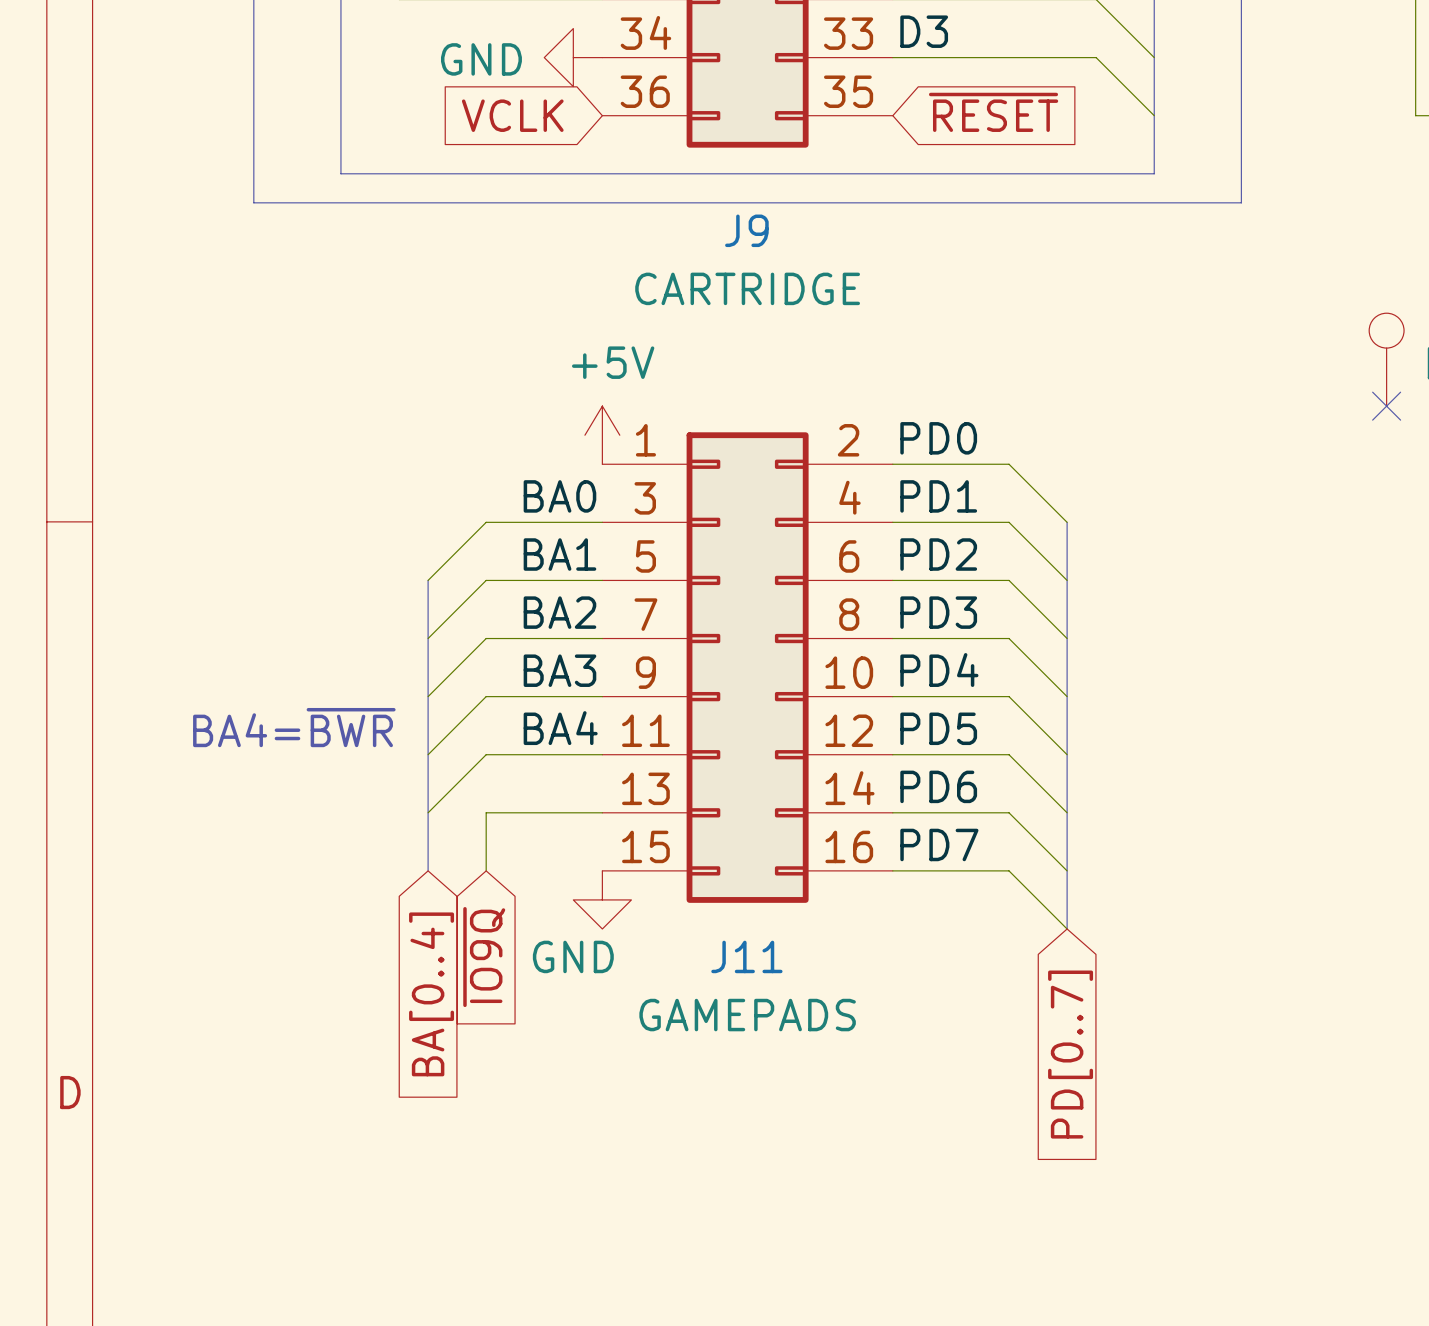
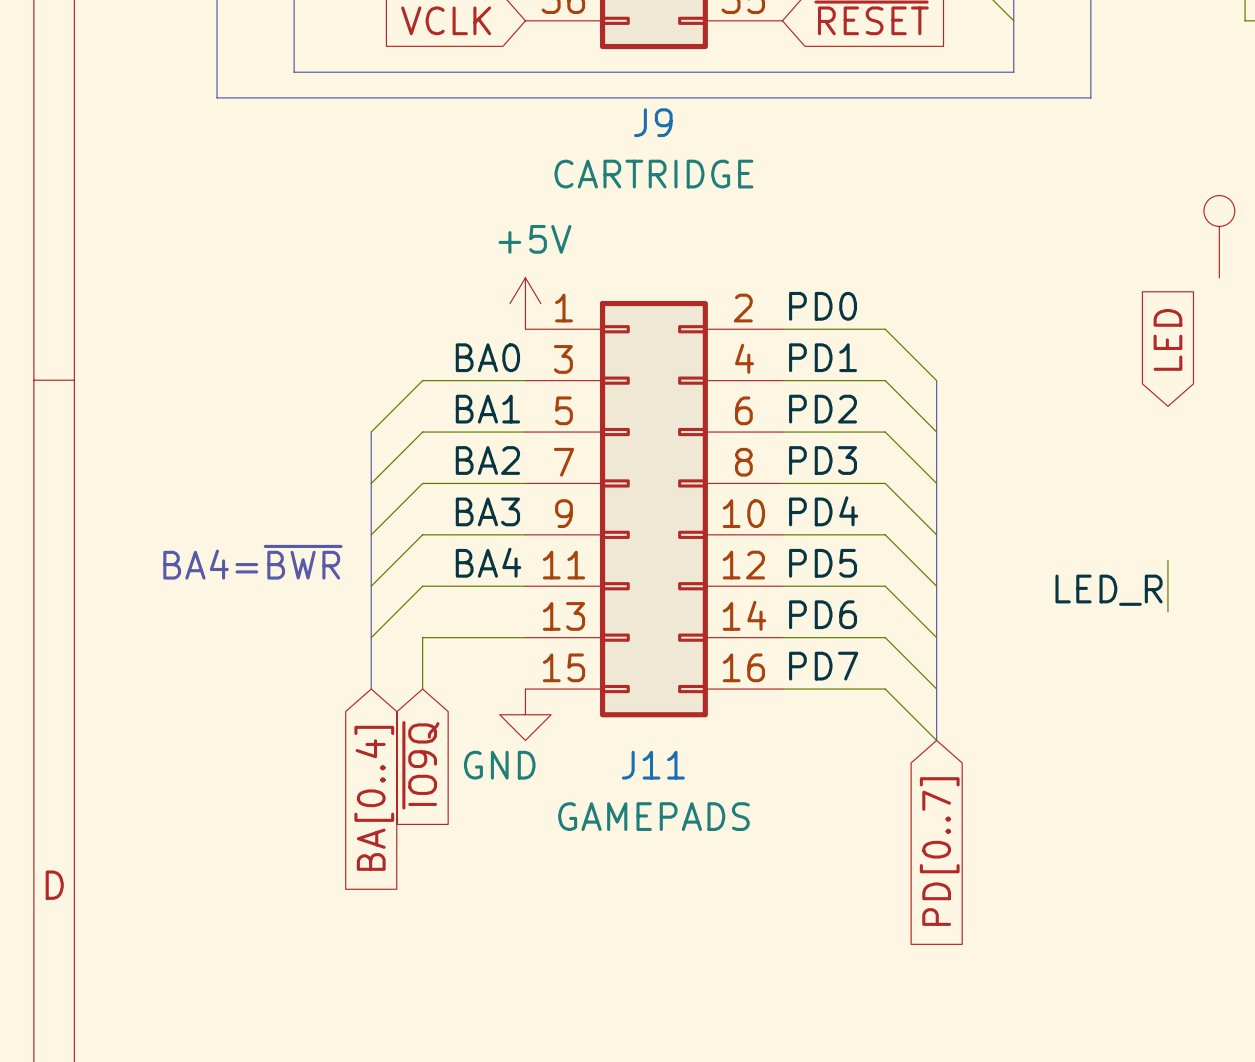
no-connect mark: (1386, 406) -> none
global label: none -> LED (1167, 339)
wire: none -> (1167, 560) (1167, 611)
label: none -> LED_R (1109, 590)

